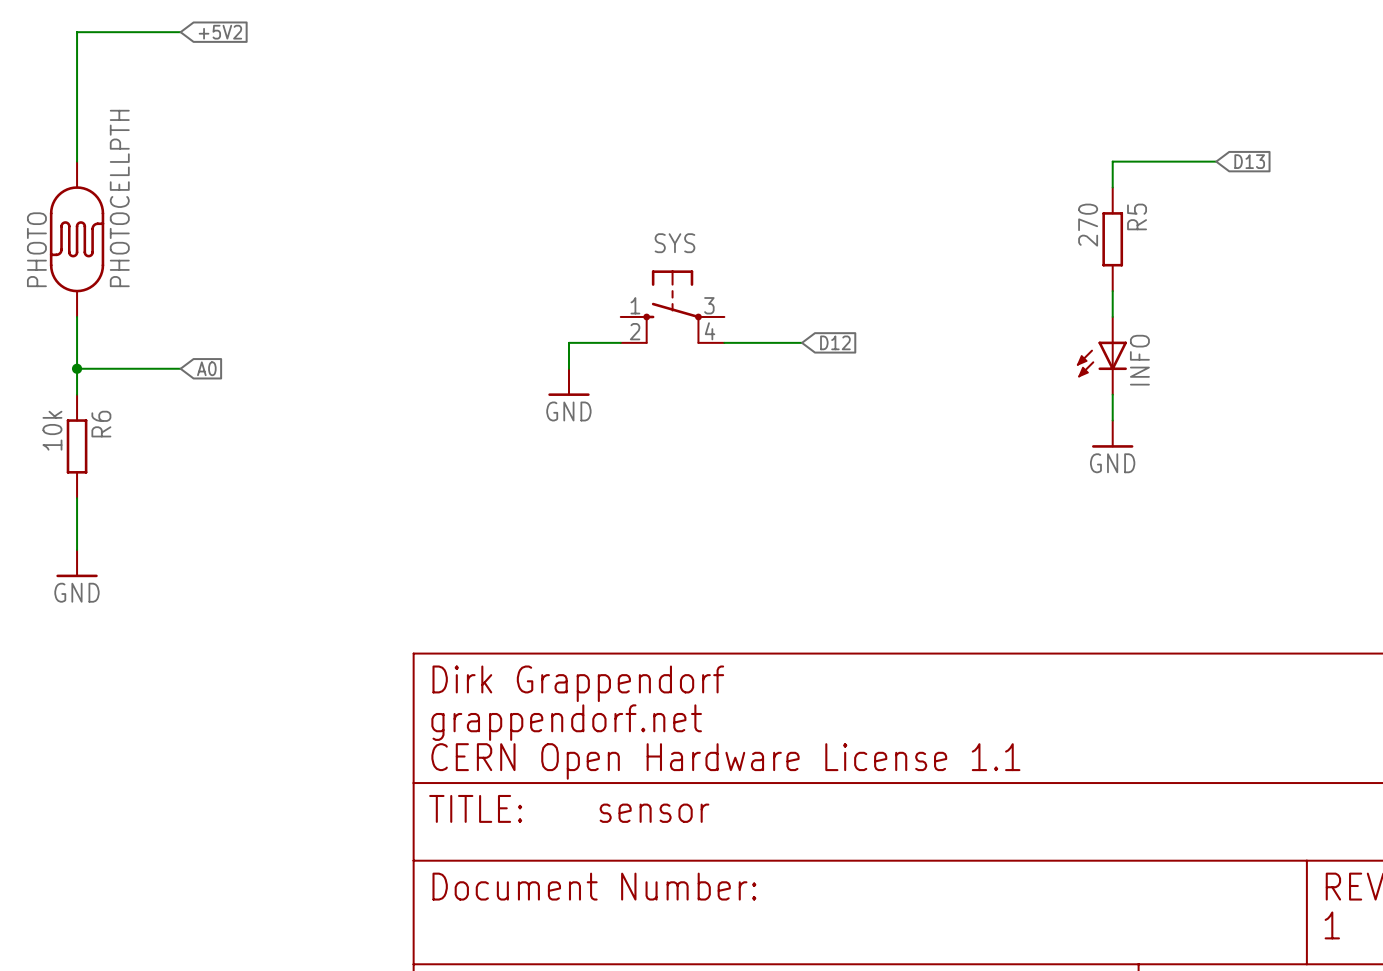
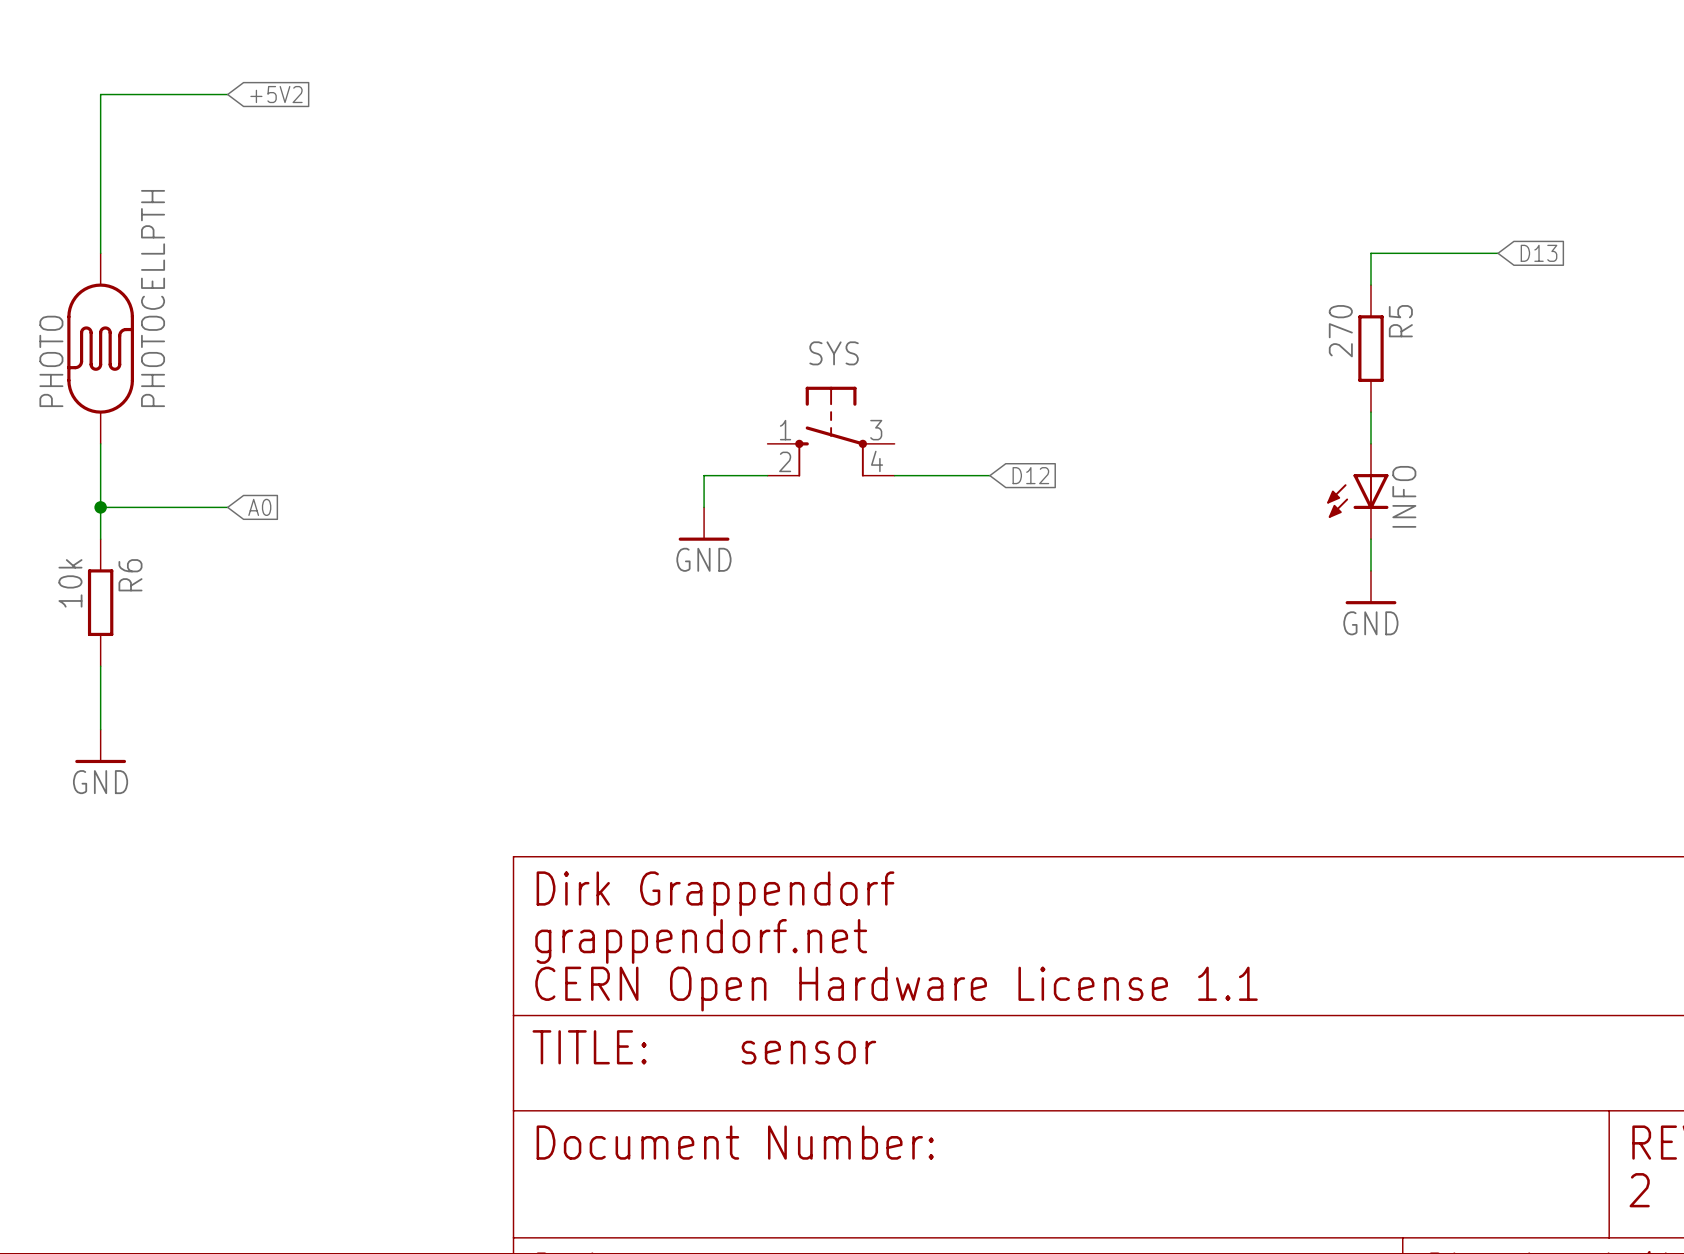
text: 1 (1332, 925) -> 2 (1639, 1190)

